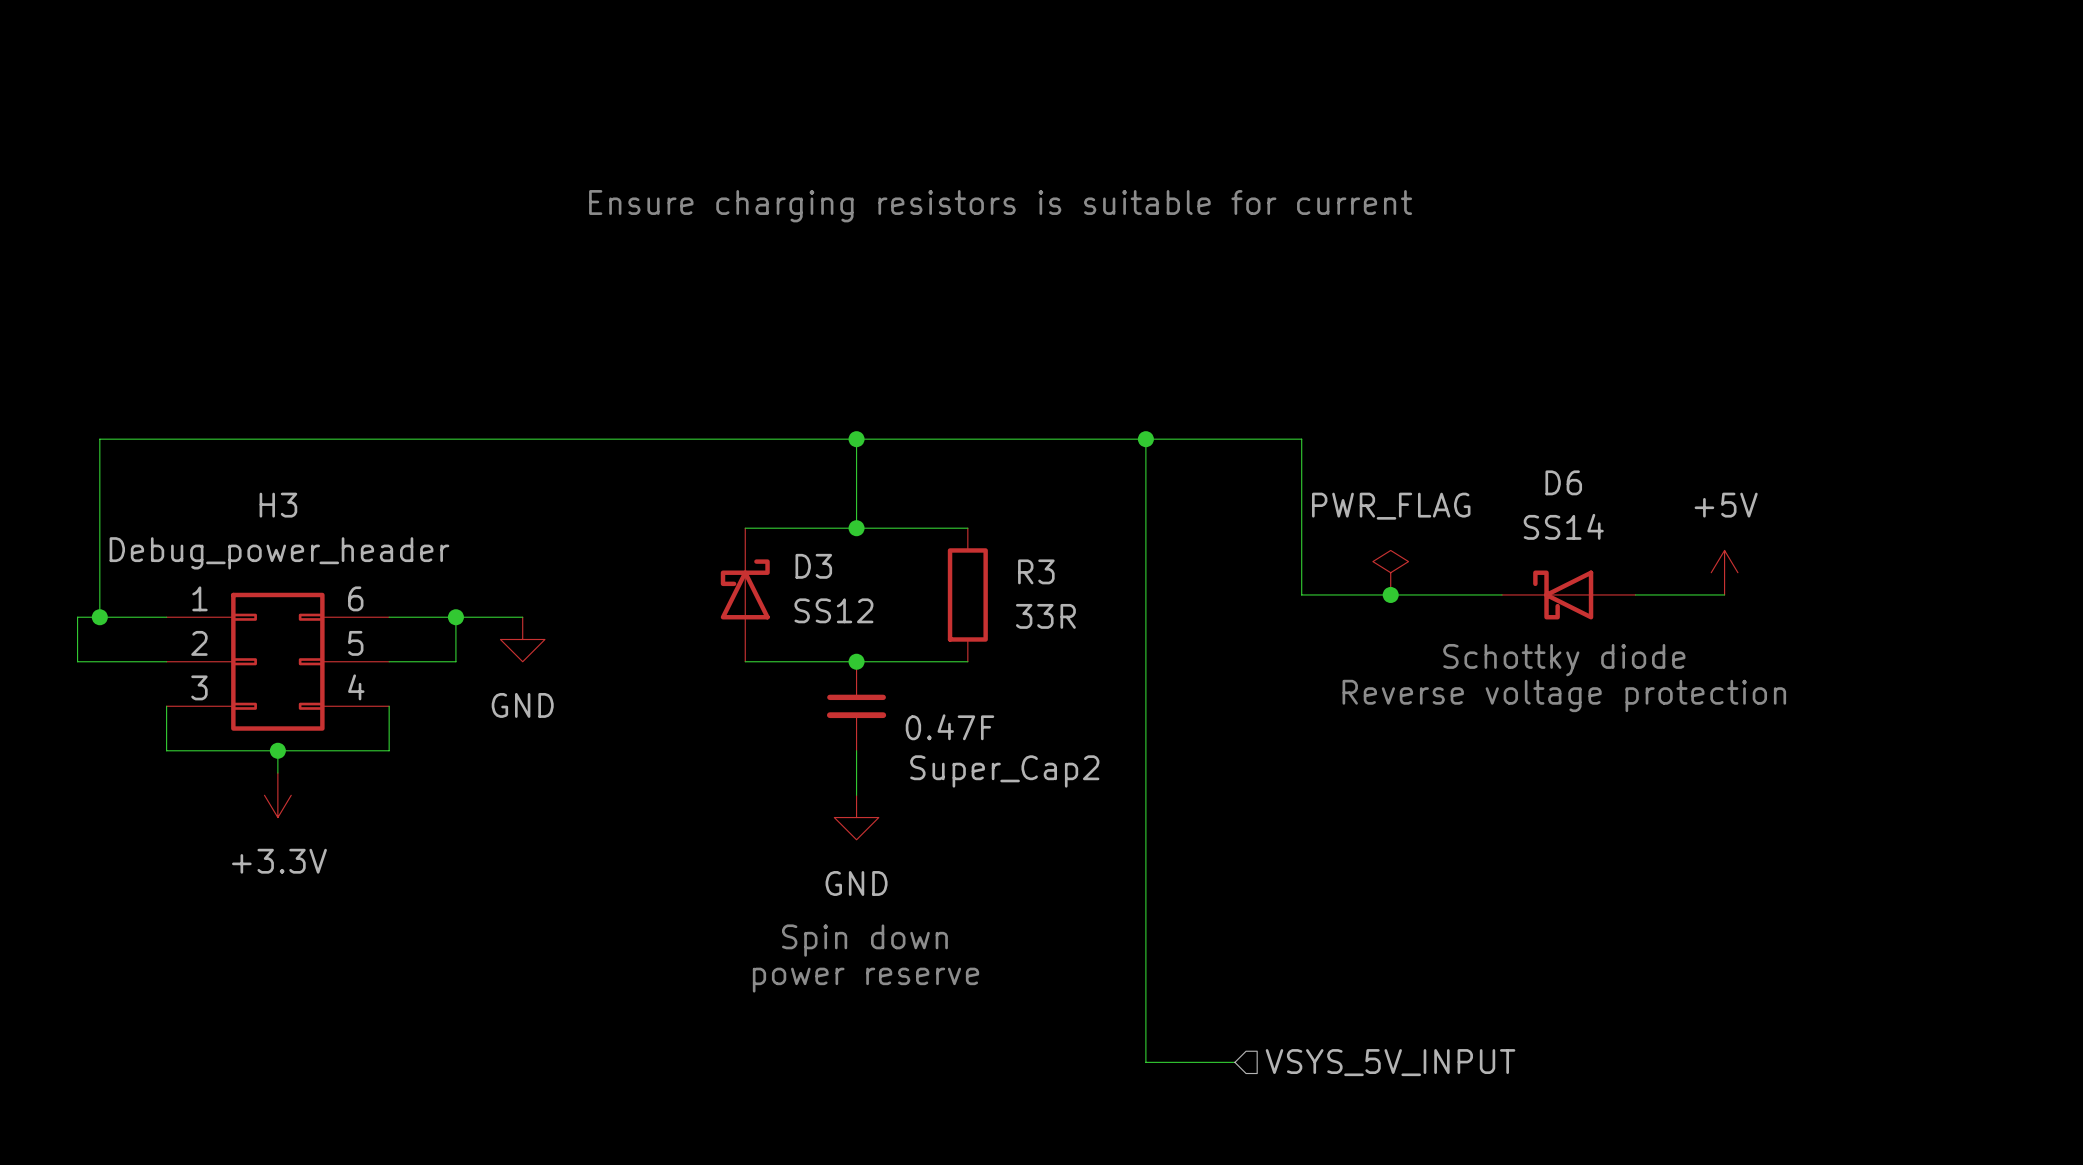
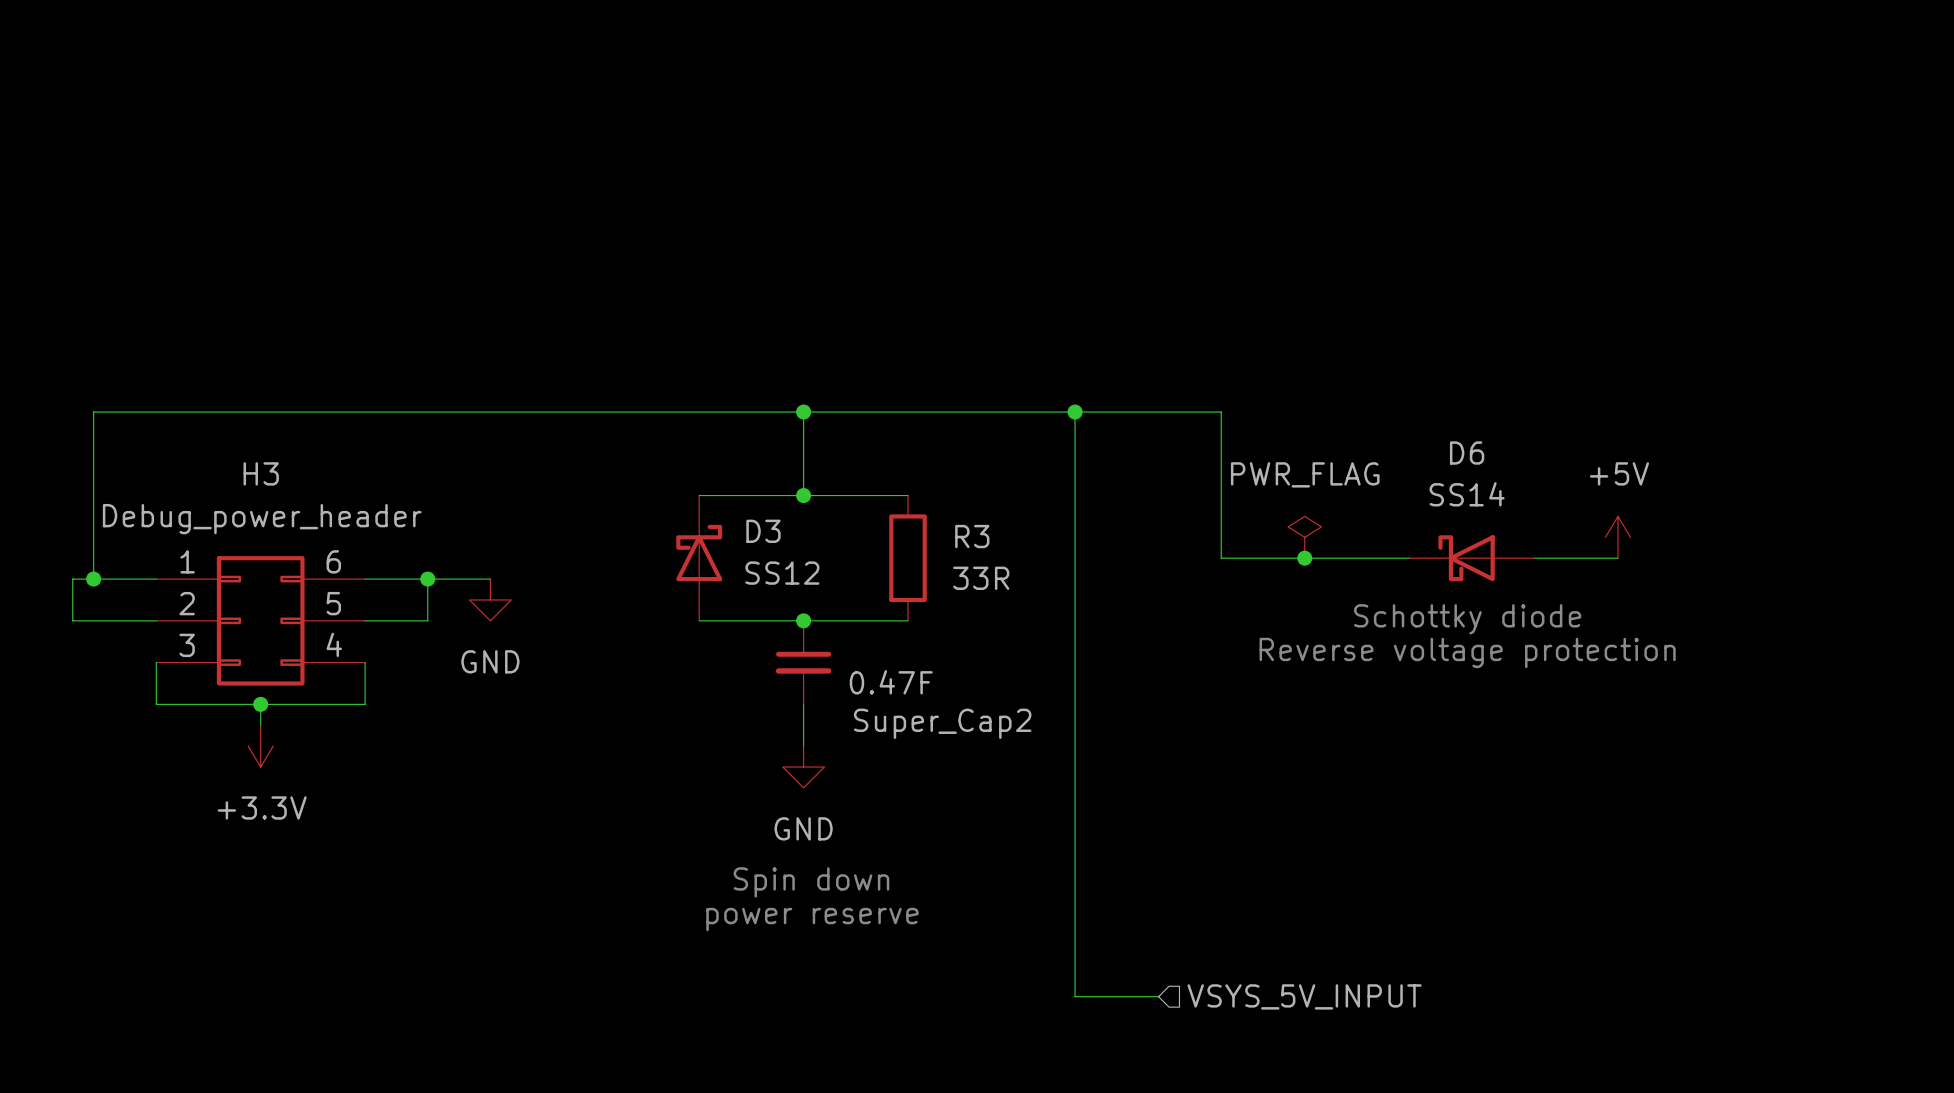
text: Ensure charging resistors is suitable for current (1000, 206) -> none

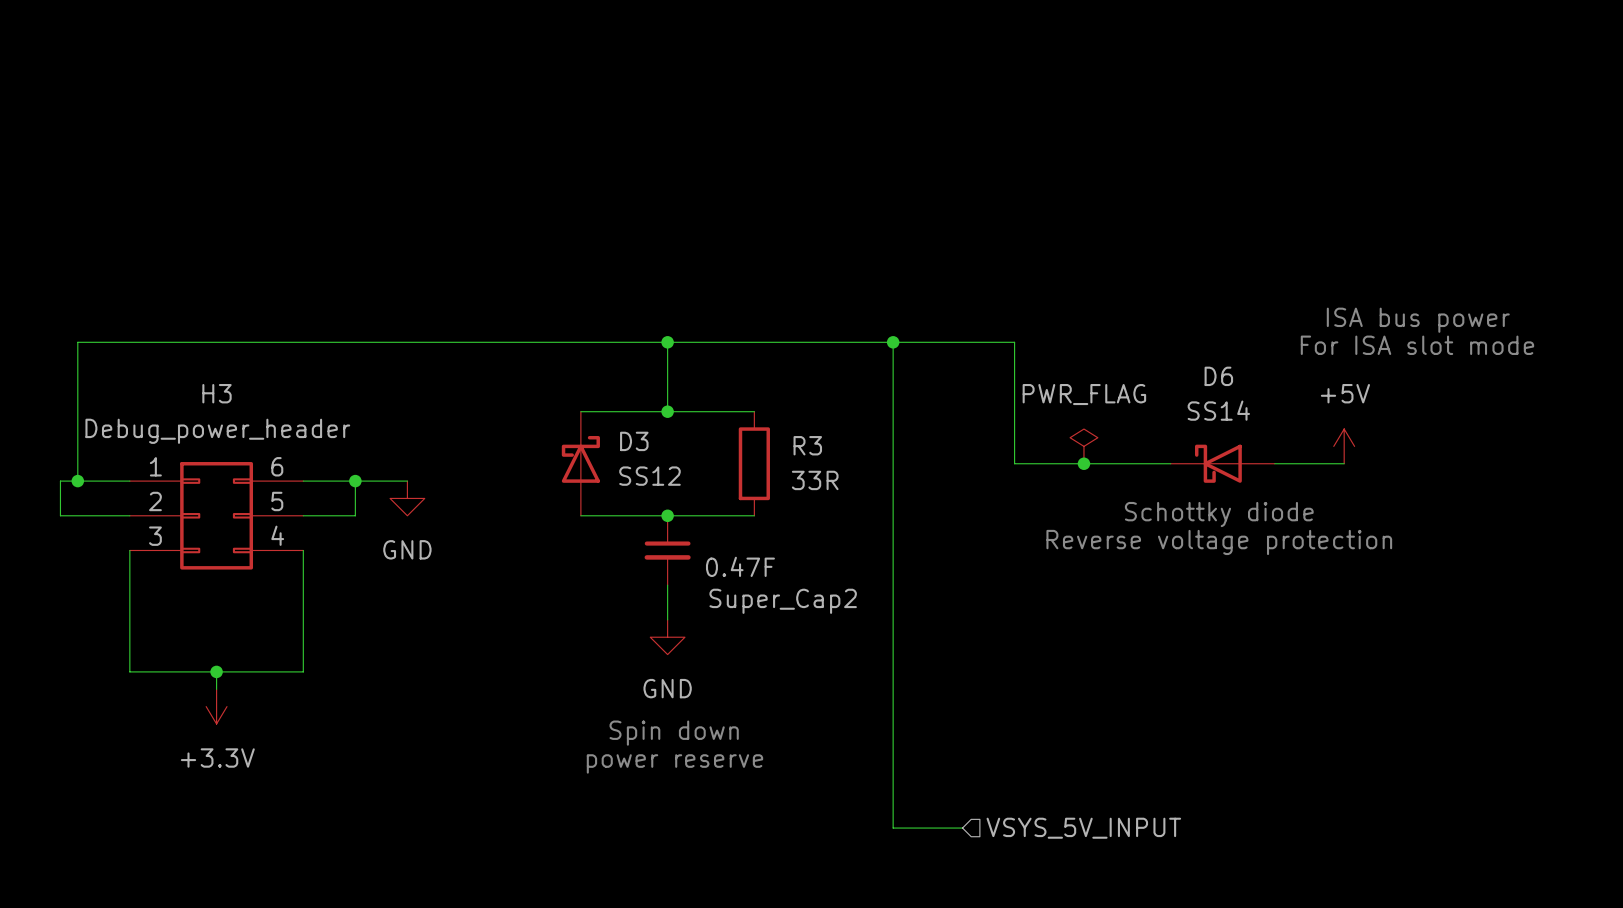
text: none -> ISA bus power (1418, 320)
text: none -> For ISA slot mode (1417, 345)
wire: (156, 704) (365, 704) -> (129, 585) (129, 671) (303, 671) (303, 585)
wire: (260, 704) (260, 725) -> (216, 671) (216, 689)
junction: (260, 704) -> none
power symbol position: +3.3V (260, 746) -> +3.3V (216, 706)
junction: none -> (216, 671)

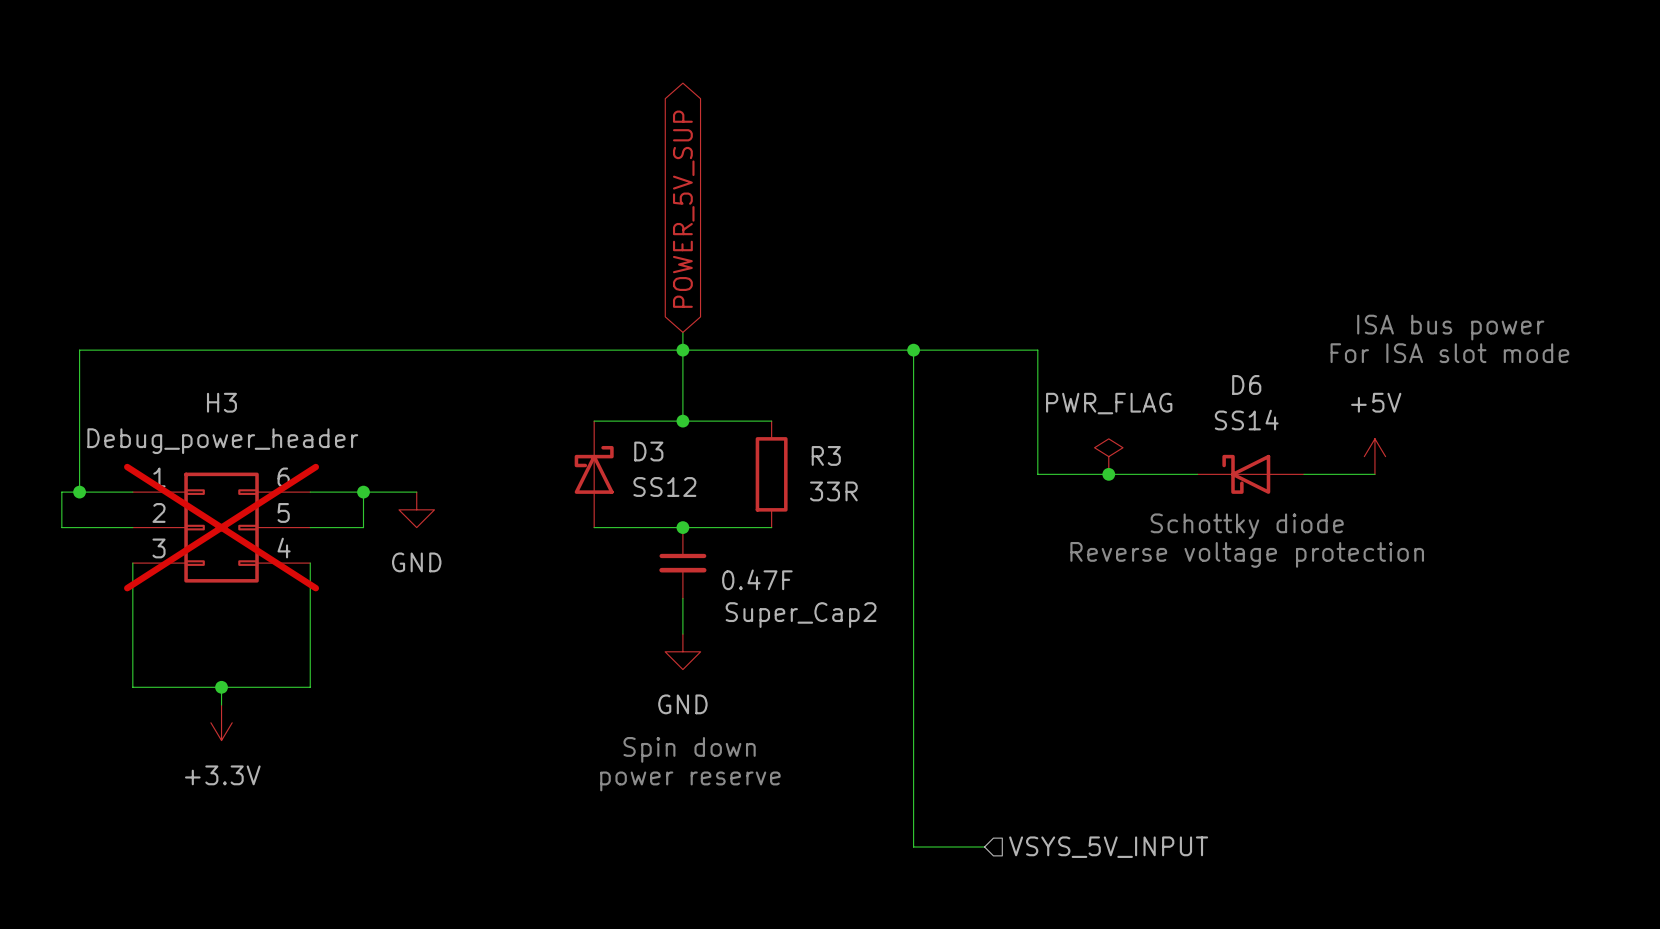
global label: none -> POWER_5V_SUP (683, 209)
wire: none -> (682, 332) (682, 350)
H3 do-not-place cross: none -> (221, 527)

